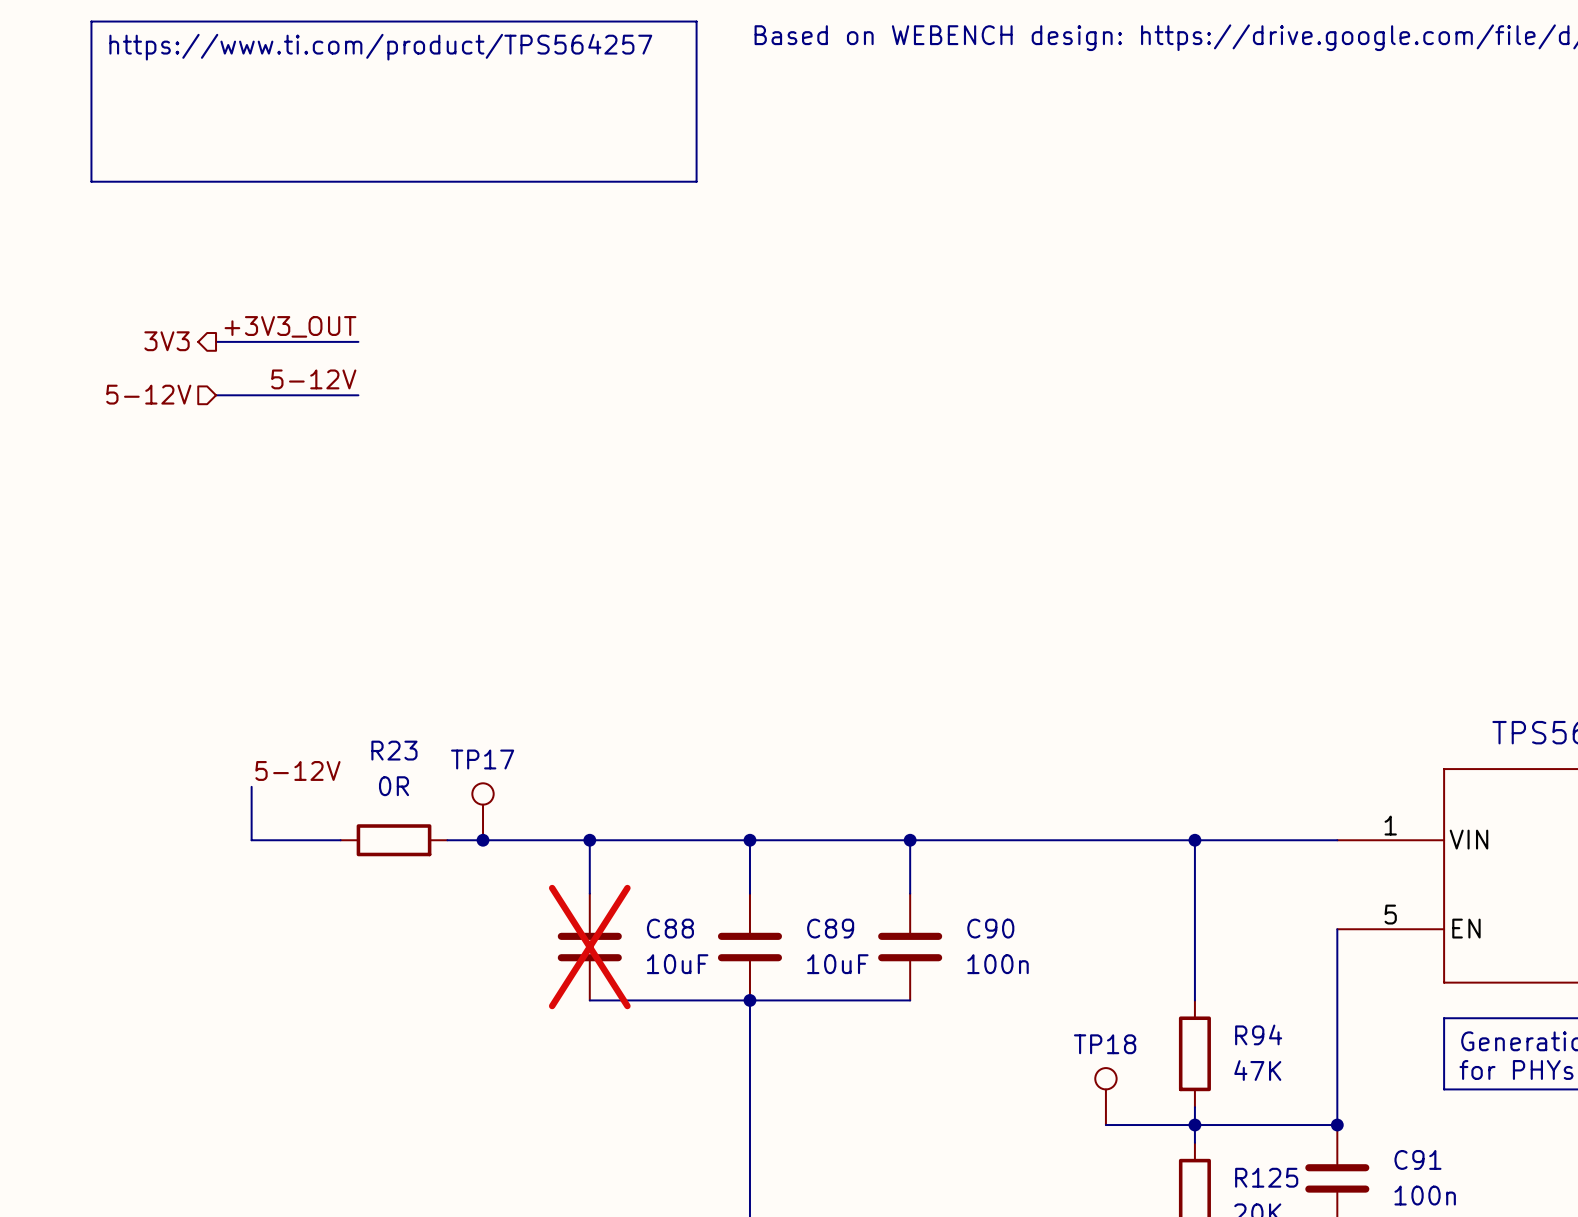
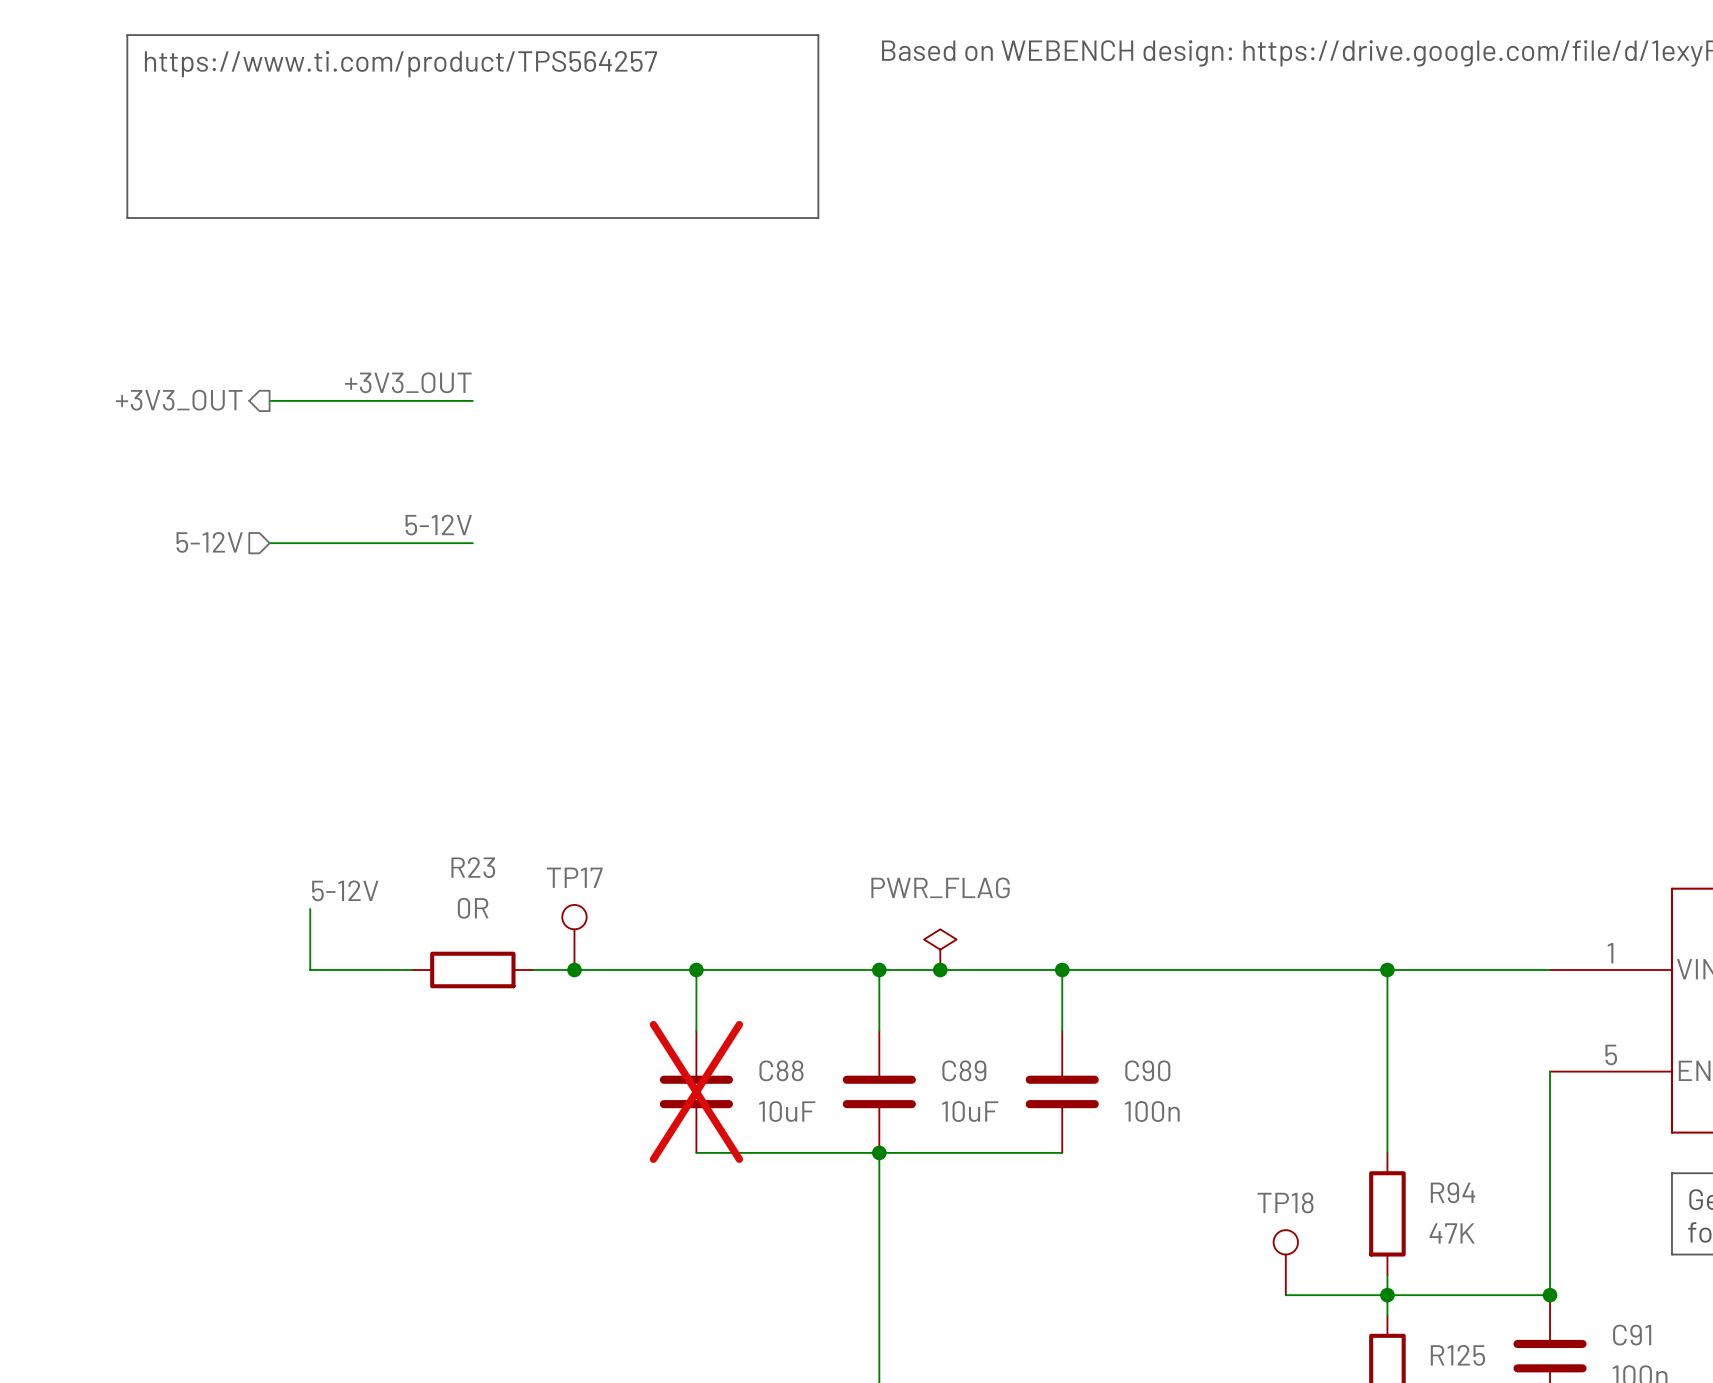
label position: +3V3_OUT (290, 326) -> +3V3_OUT (408, 382)
hierarchical label: 3V3 (167, 341) -> +3V3_OUT (179, 400)
wire: none -> (432, 400) (472, 400)
label position: 5-12V (313, 379) -> 5-12V (438, 525)
hierarchical label position: 5-12V (148, 394) -> 5-12V (209, 542)
wire: (216, 395) (358, 395) -> none
wire: none -> (269, 543) (472, 543)
power symbol: none -> PWR_FLAG (940, 949)
junction: none -> (940, 969)

